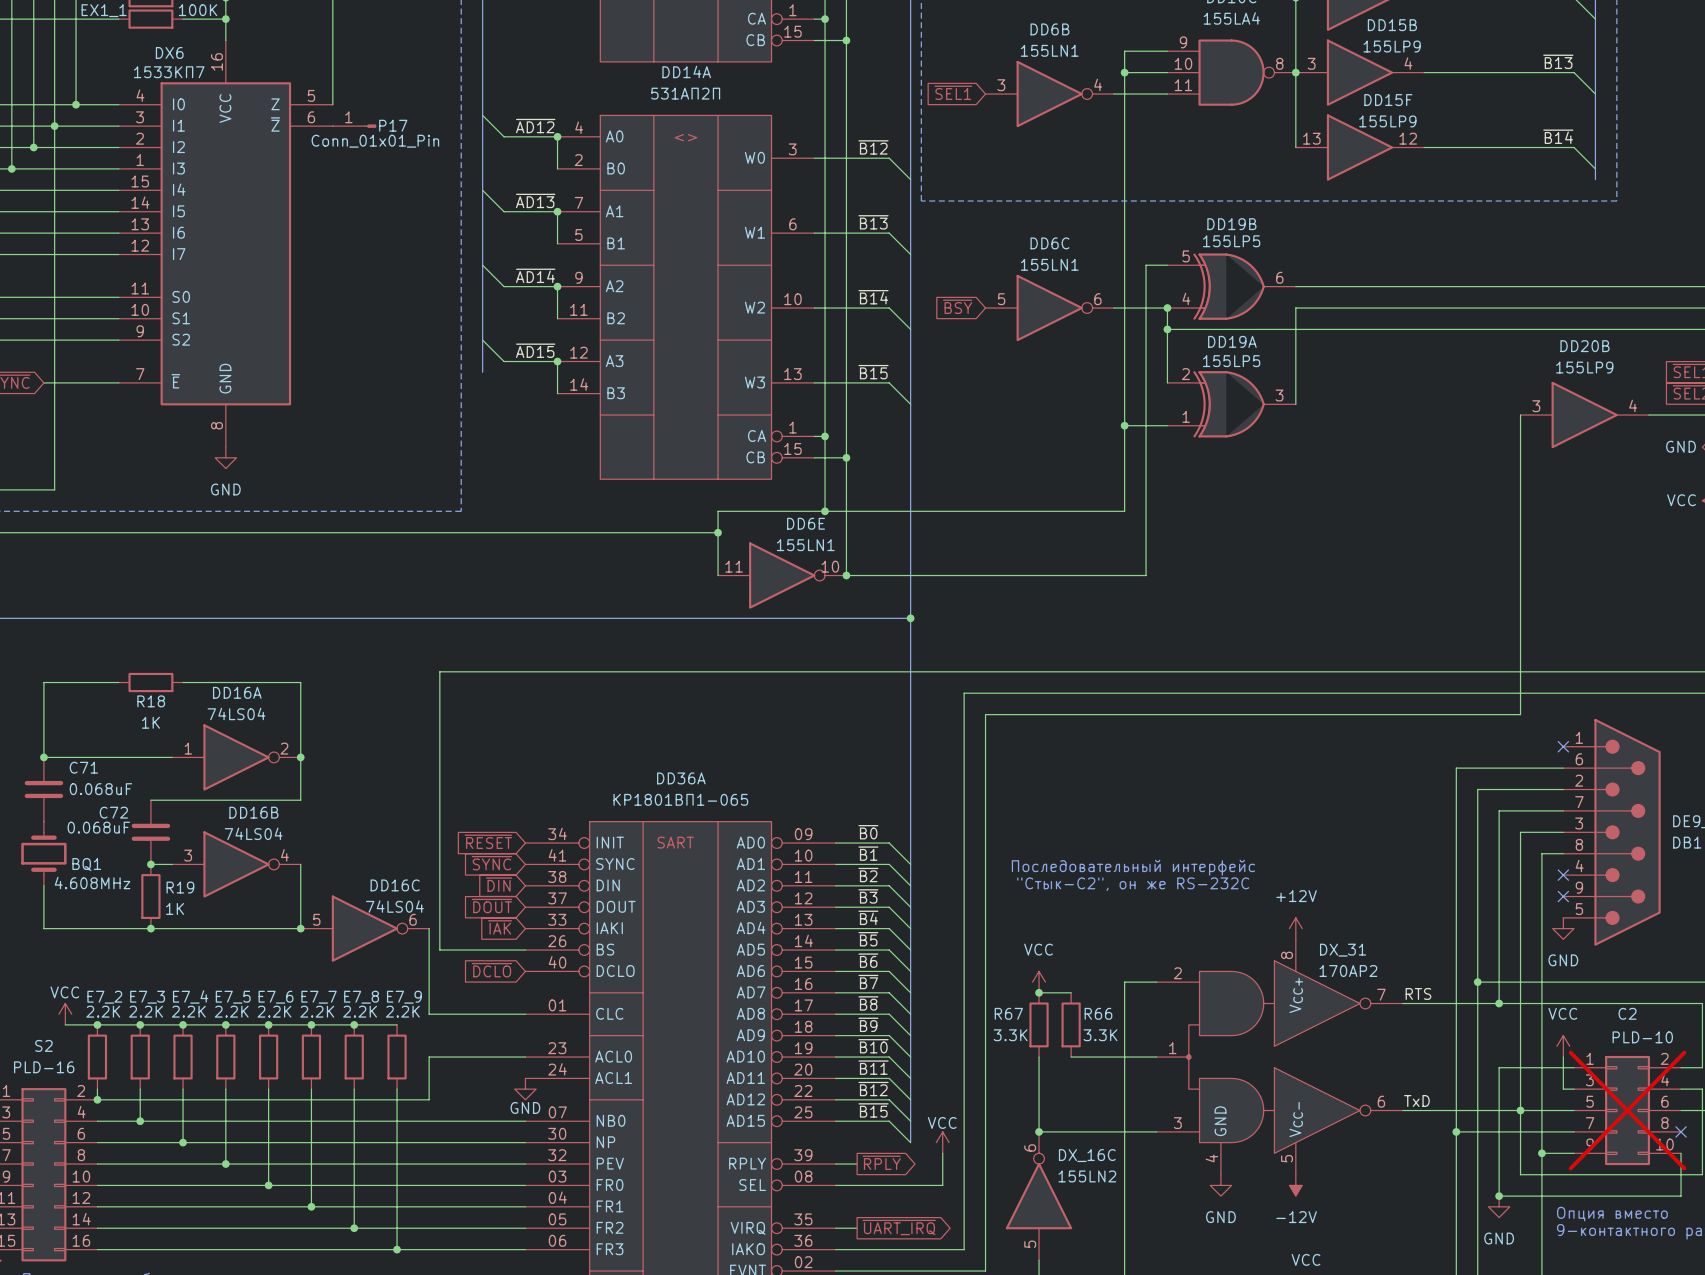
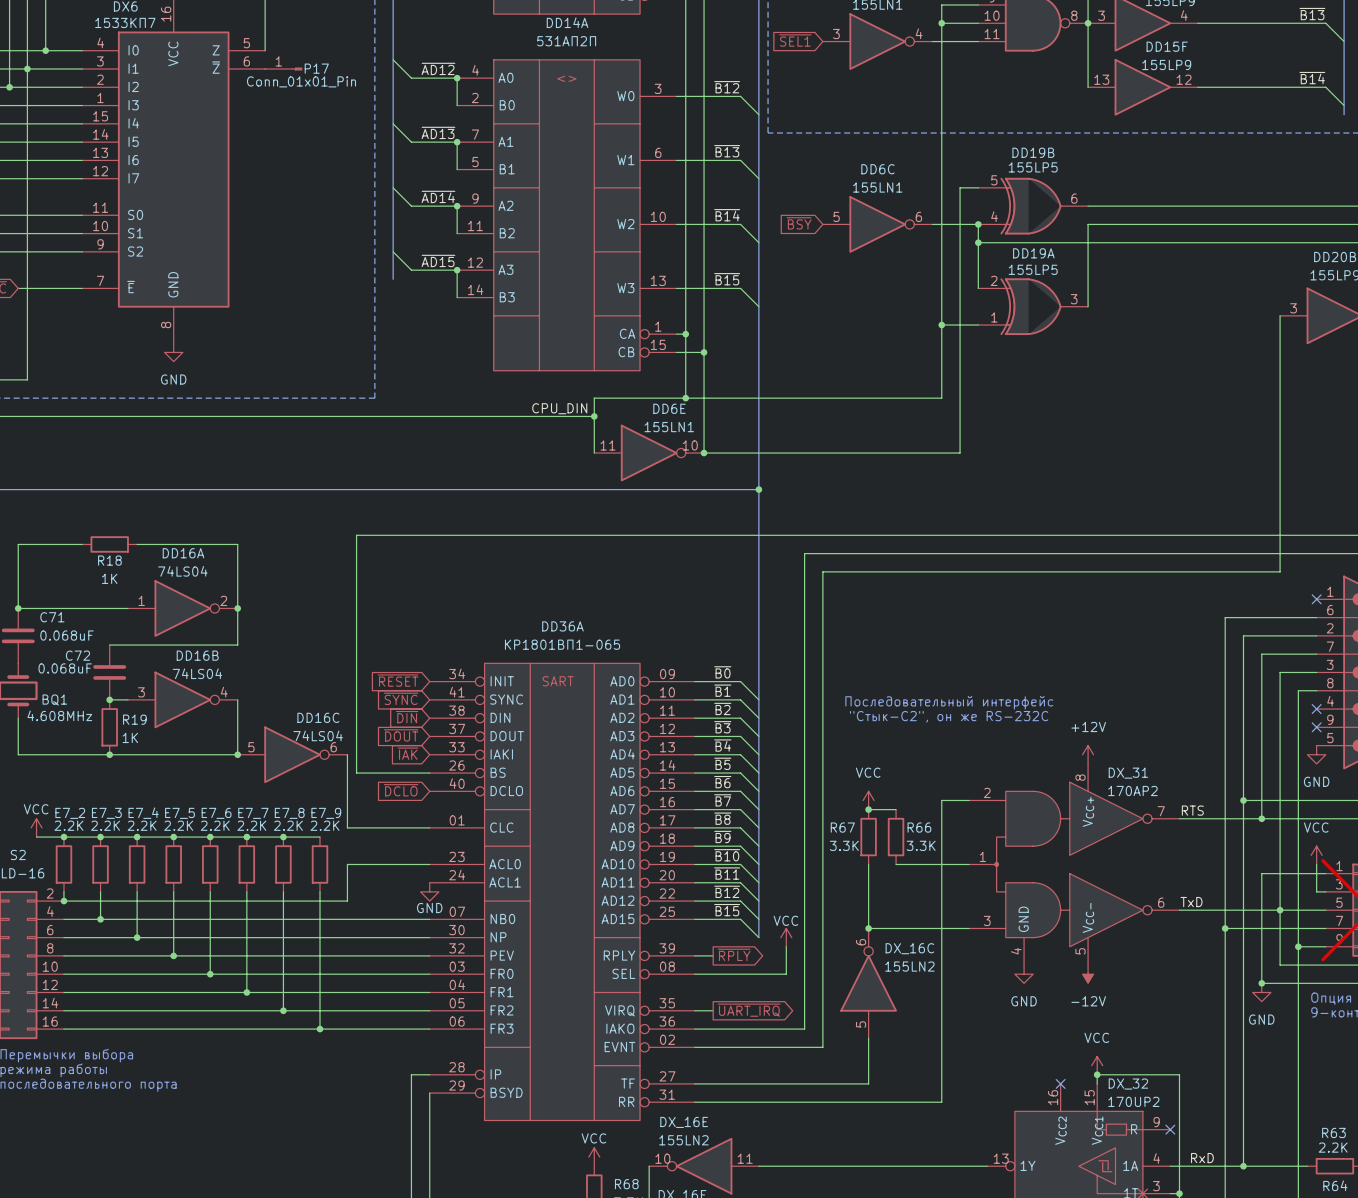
label: none -> CPU_DIN (559, 408)

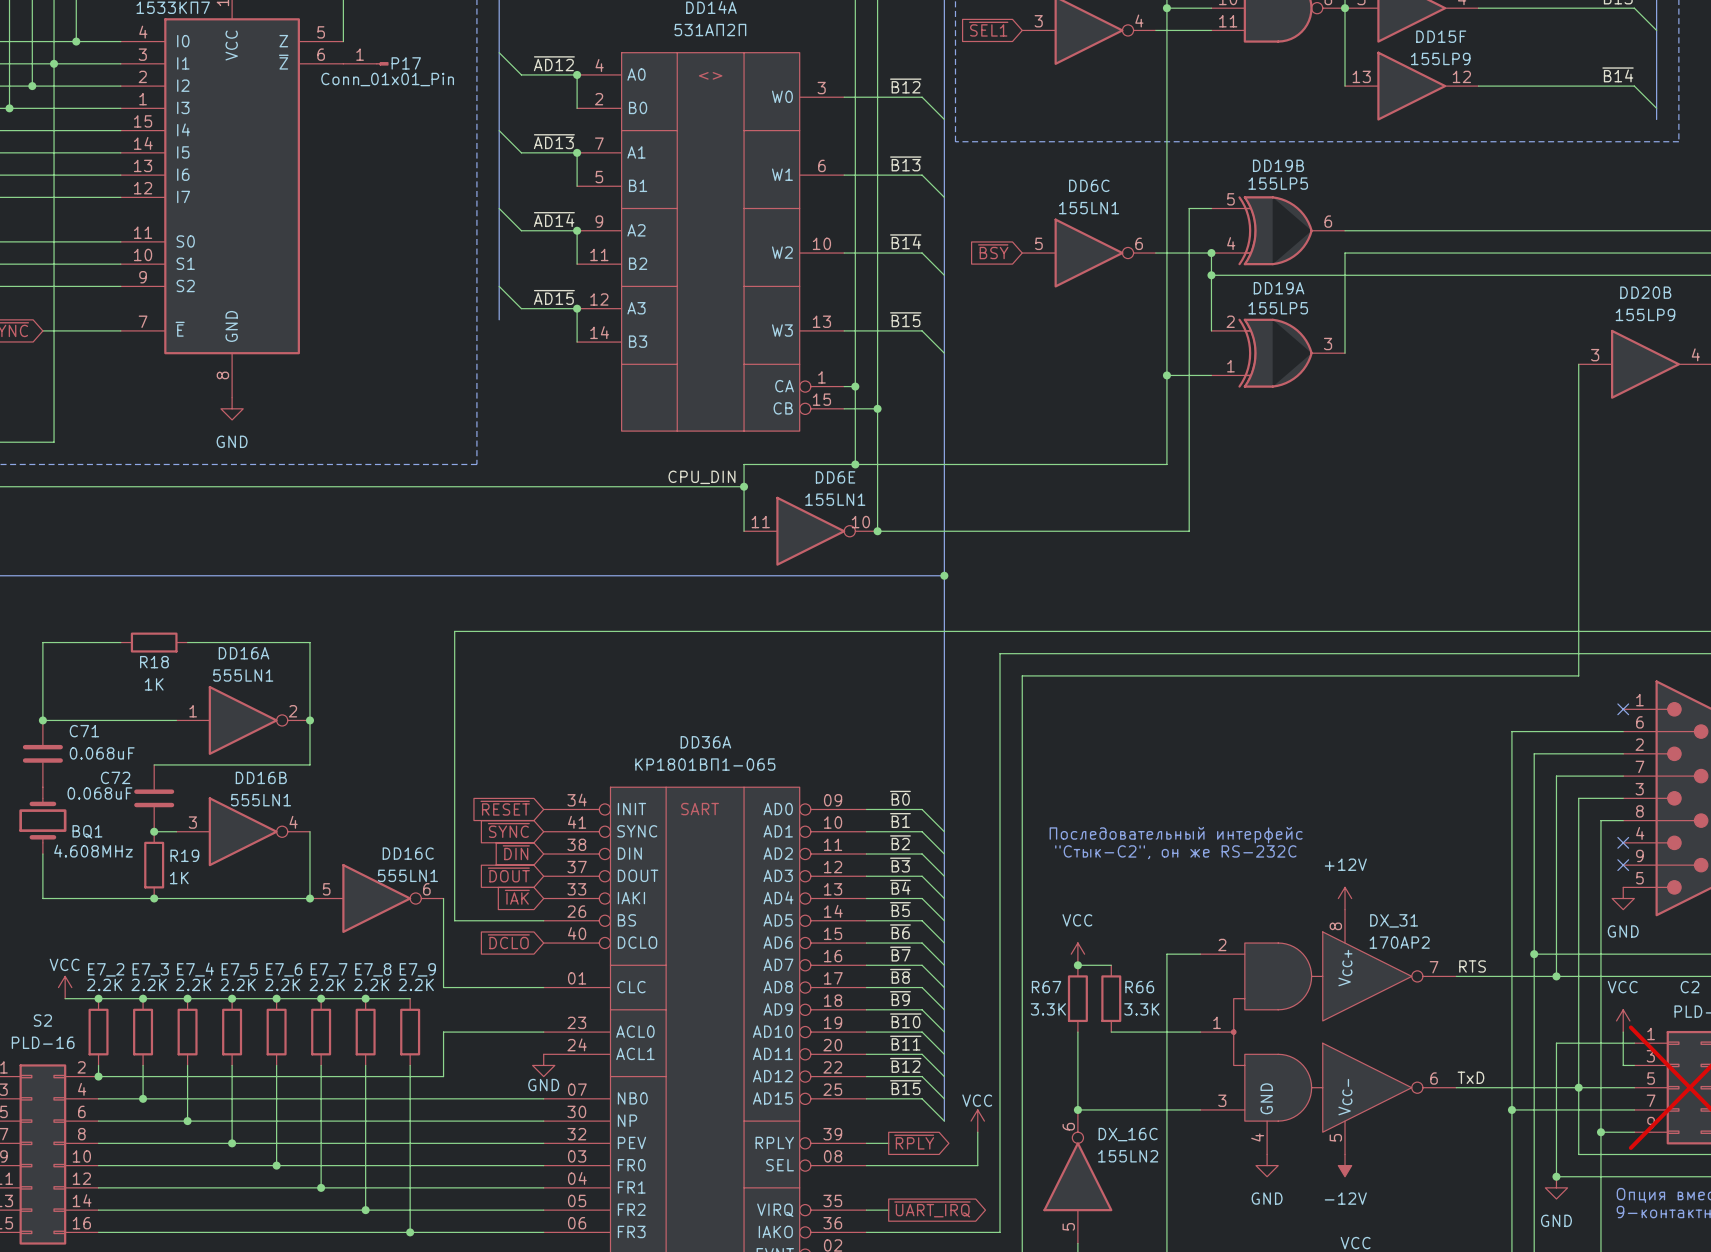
DD16A value: 74LS04 (182, 571) -> 555LN1 (243, 675)
DD16B value: 74LS04 (197, 673) -> 555LN1 (261, 800)
DD16C value: 74LS04 (318, 735) -> 555LN1 (407, 875)

